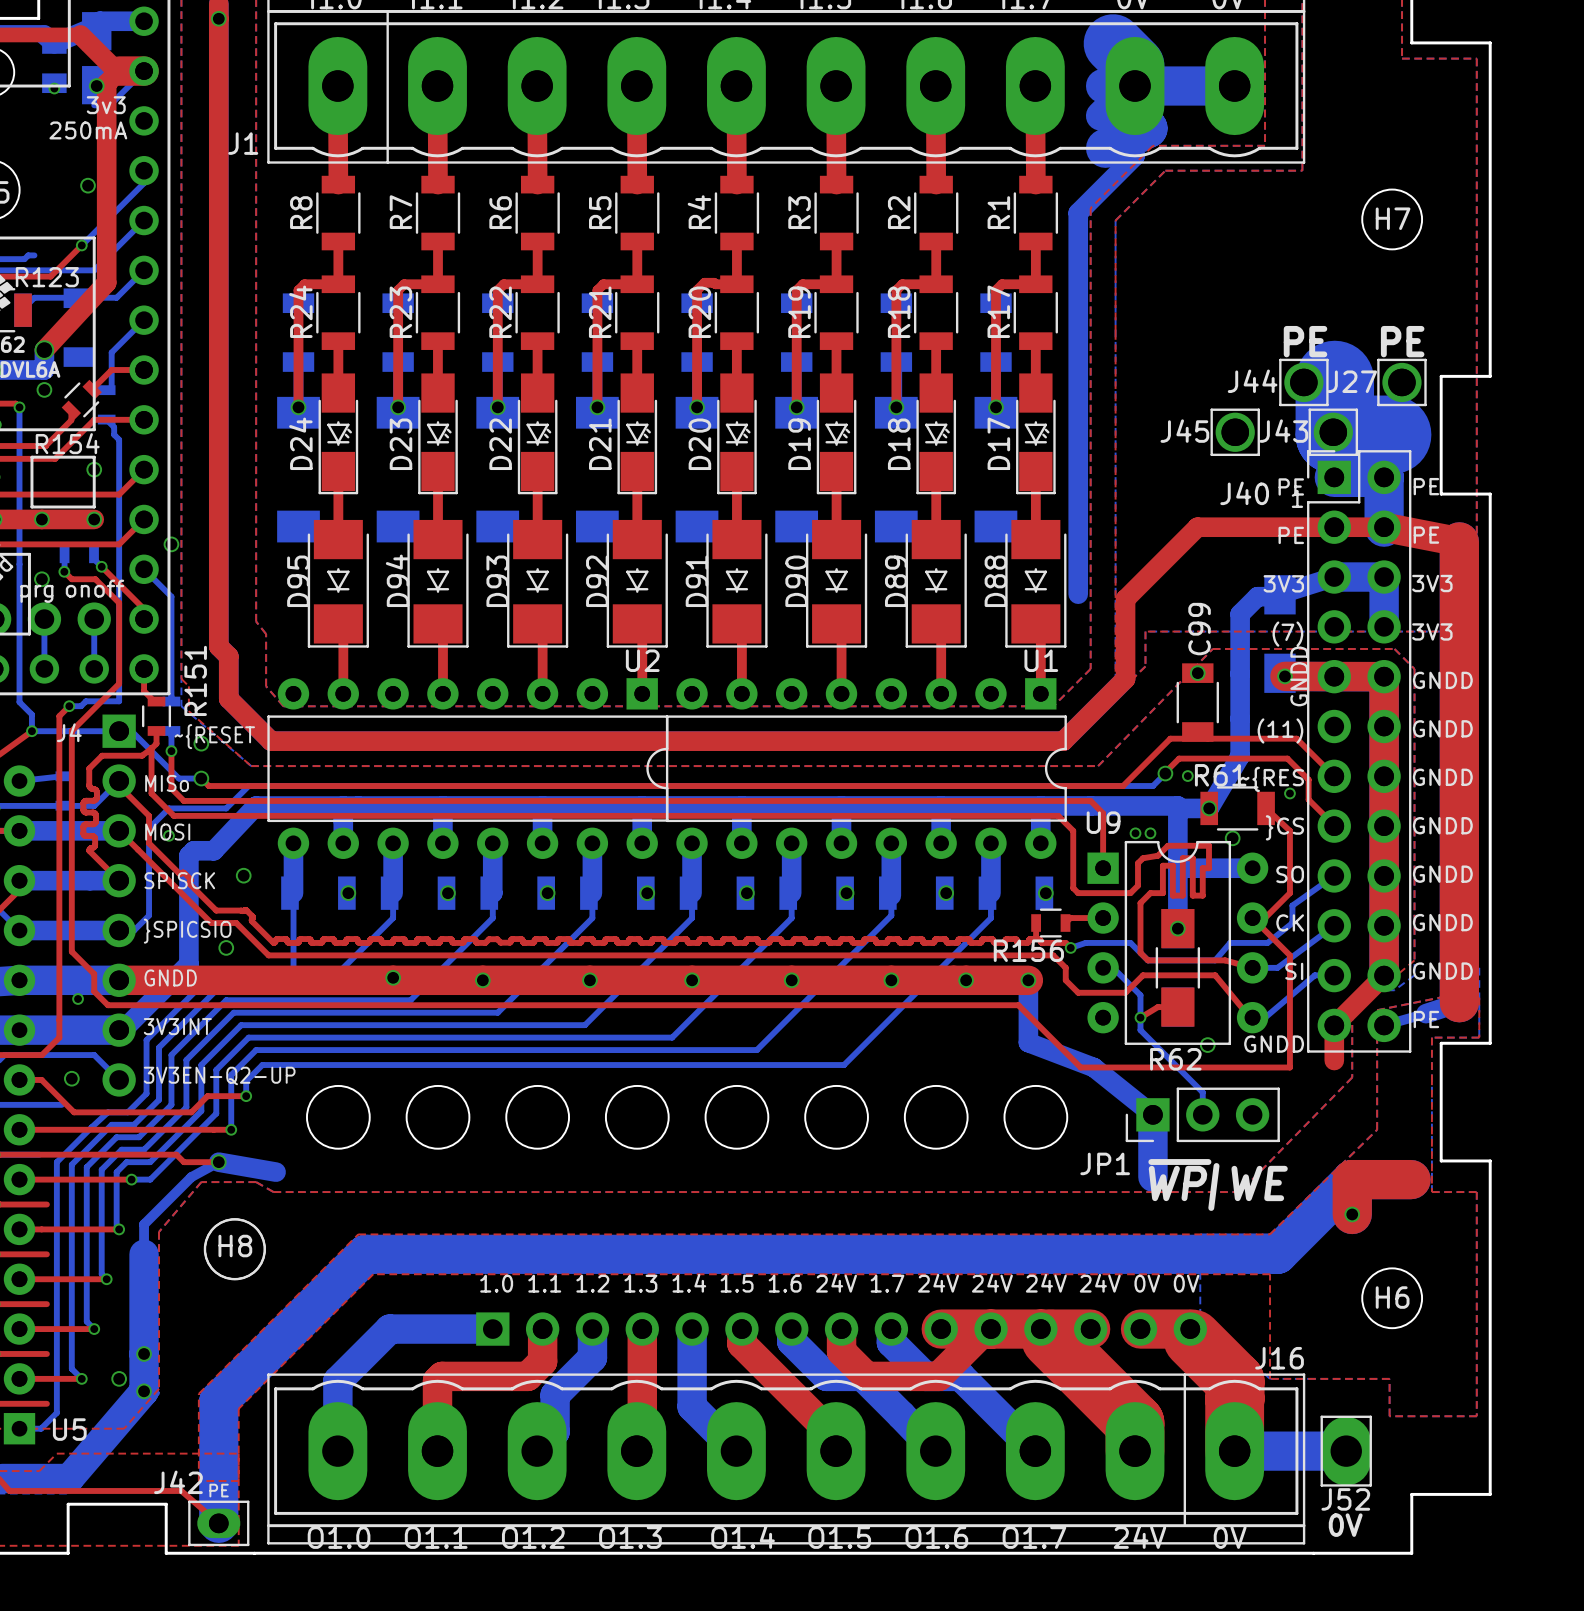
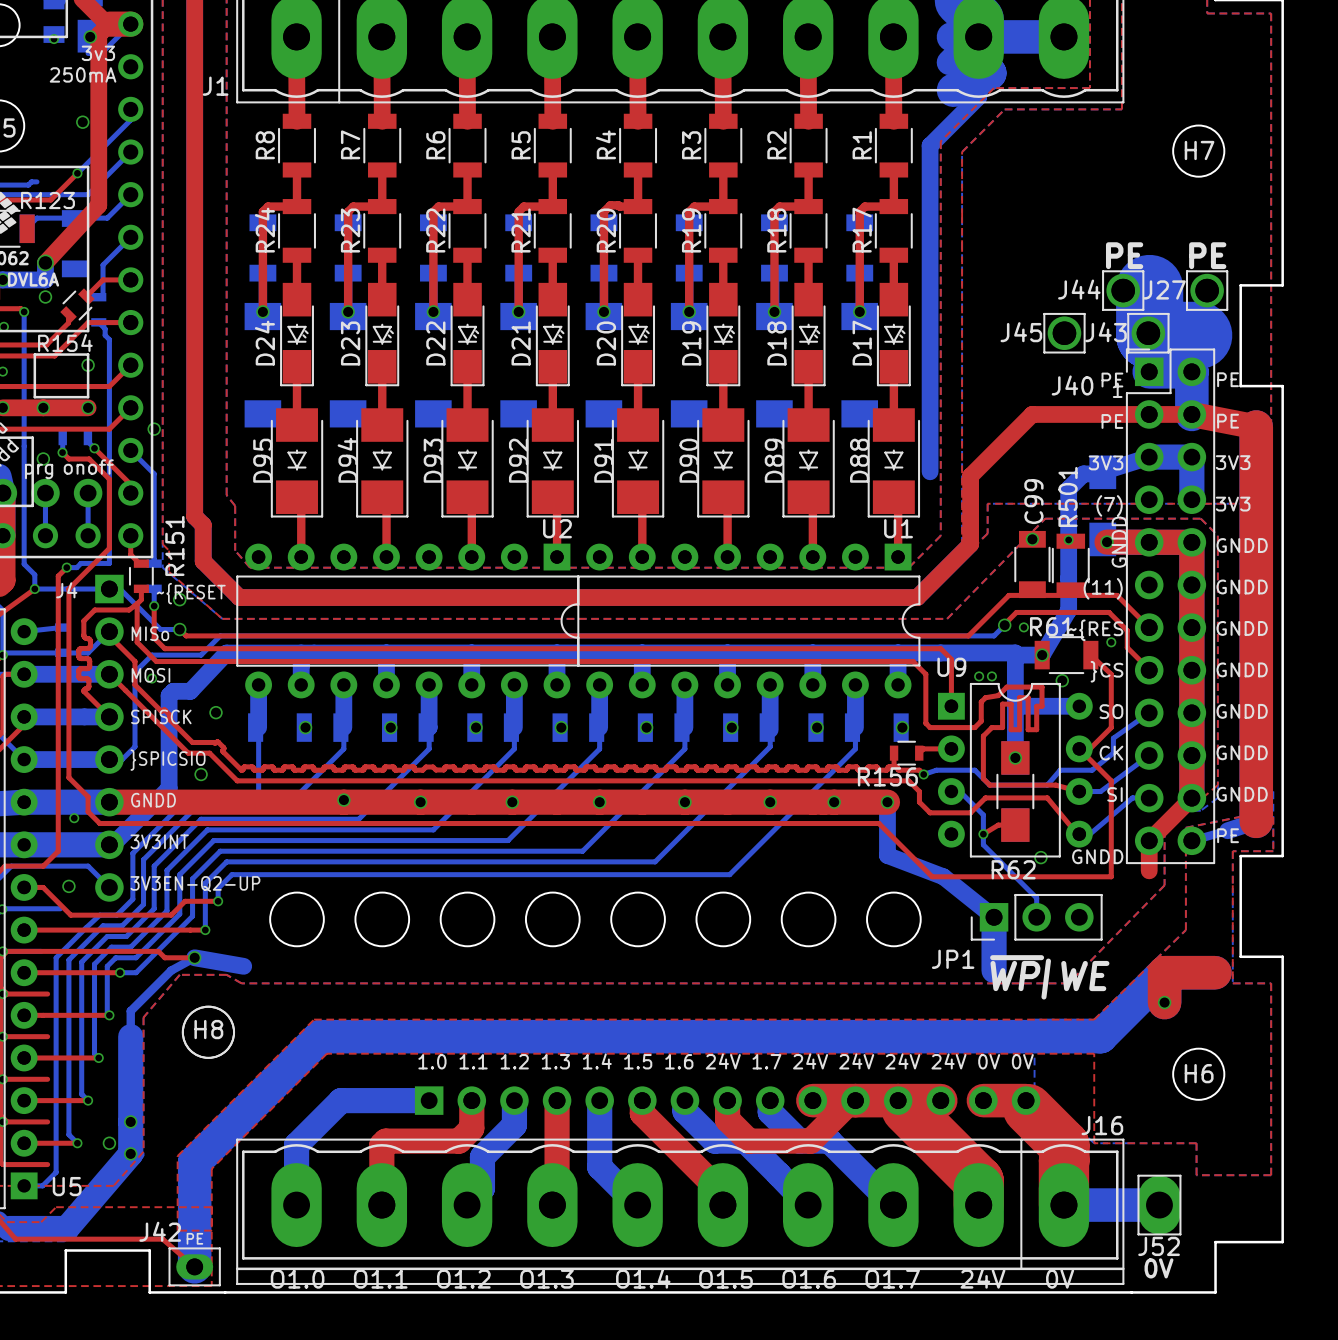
via: none -> (1068, 539)
R501: none -> (1070, 565)

